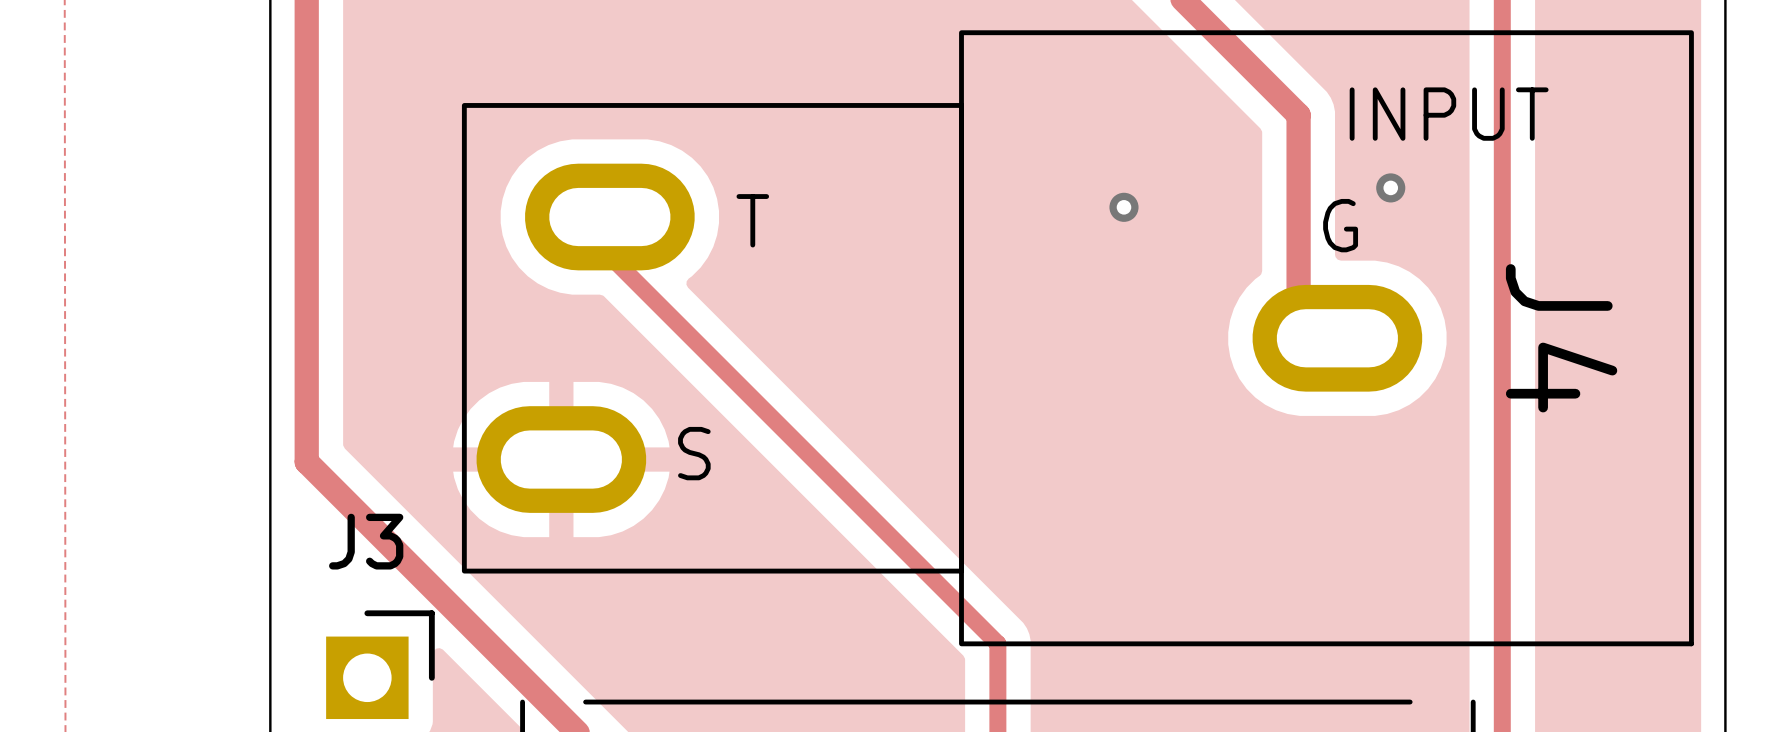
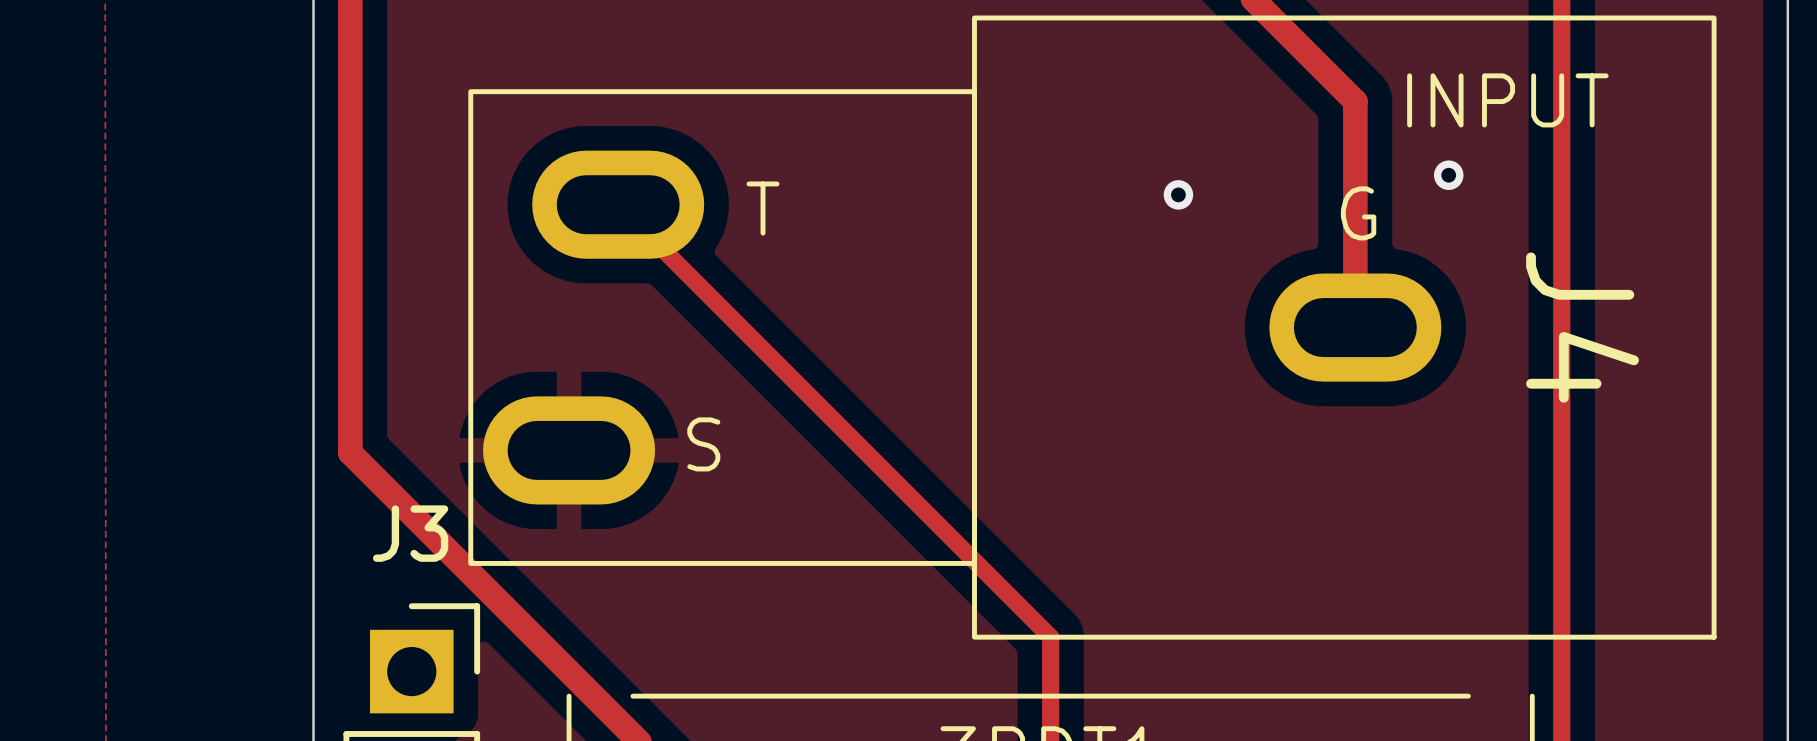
J4 position: (1077, 338) -> (1092, 327)

